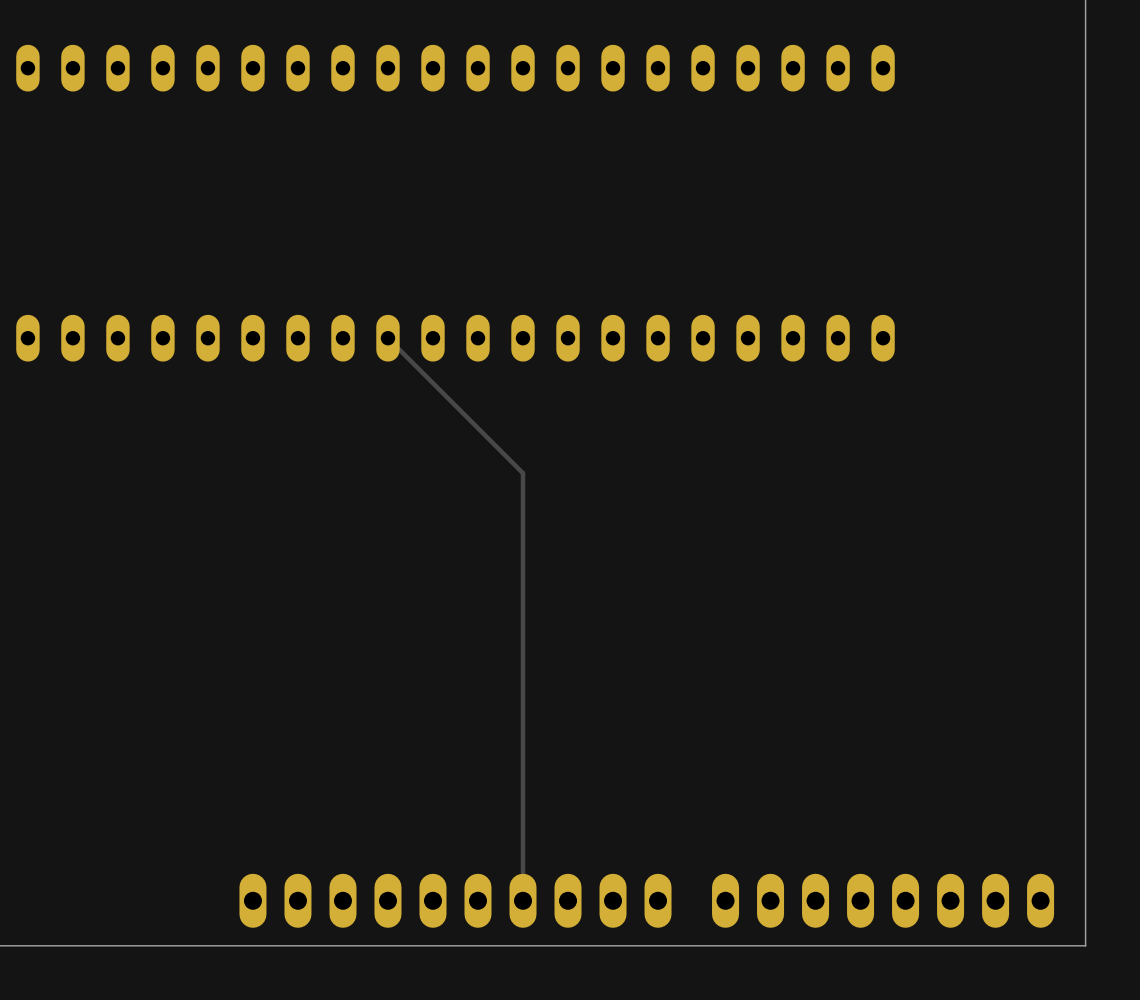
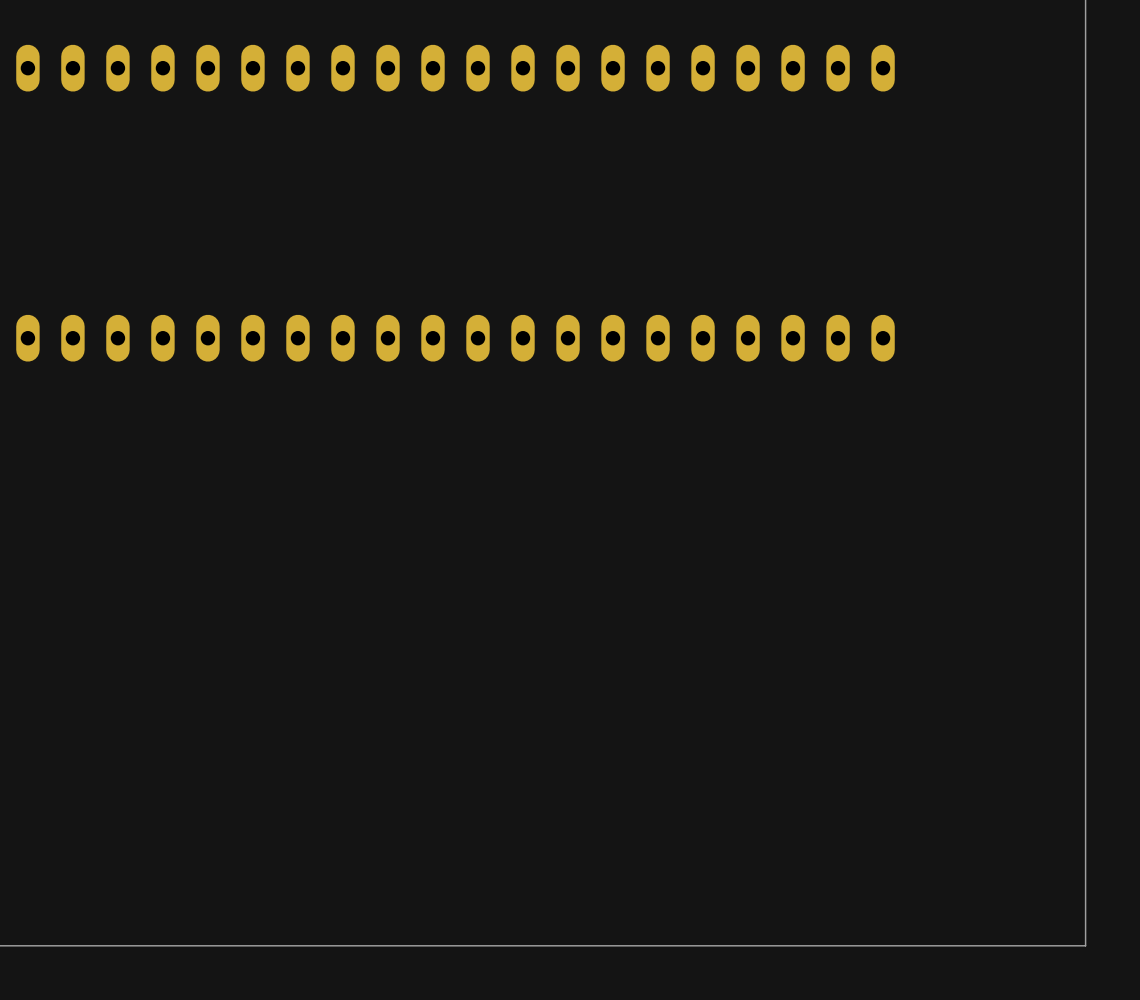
track: (387, 338) (523, 473) (523, 900) -> none
part: (455, 900) -> none
part: (883, 900) -> none

